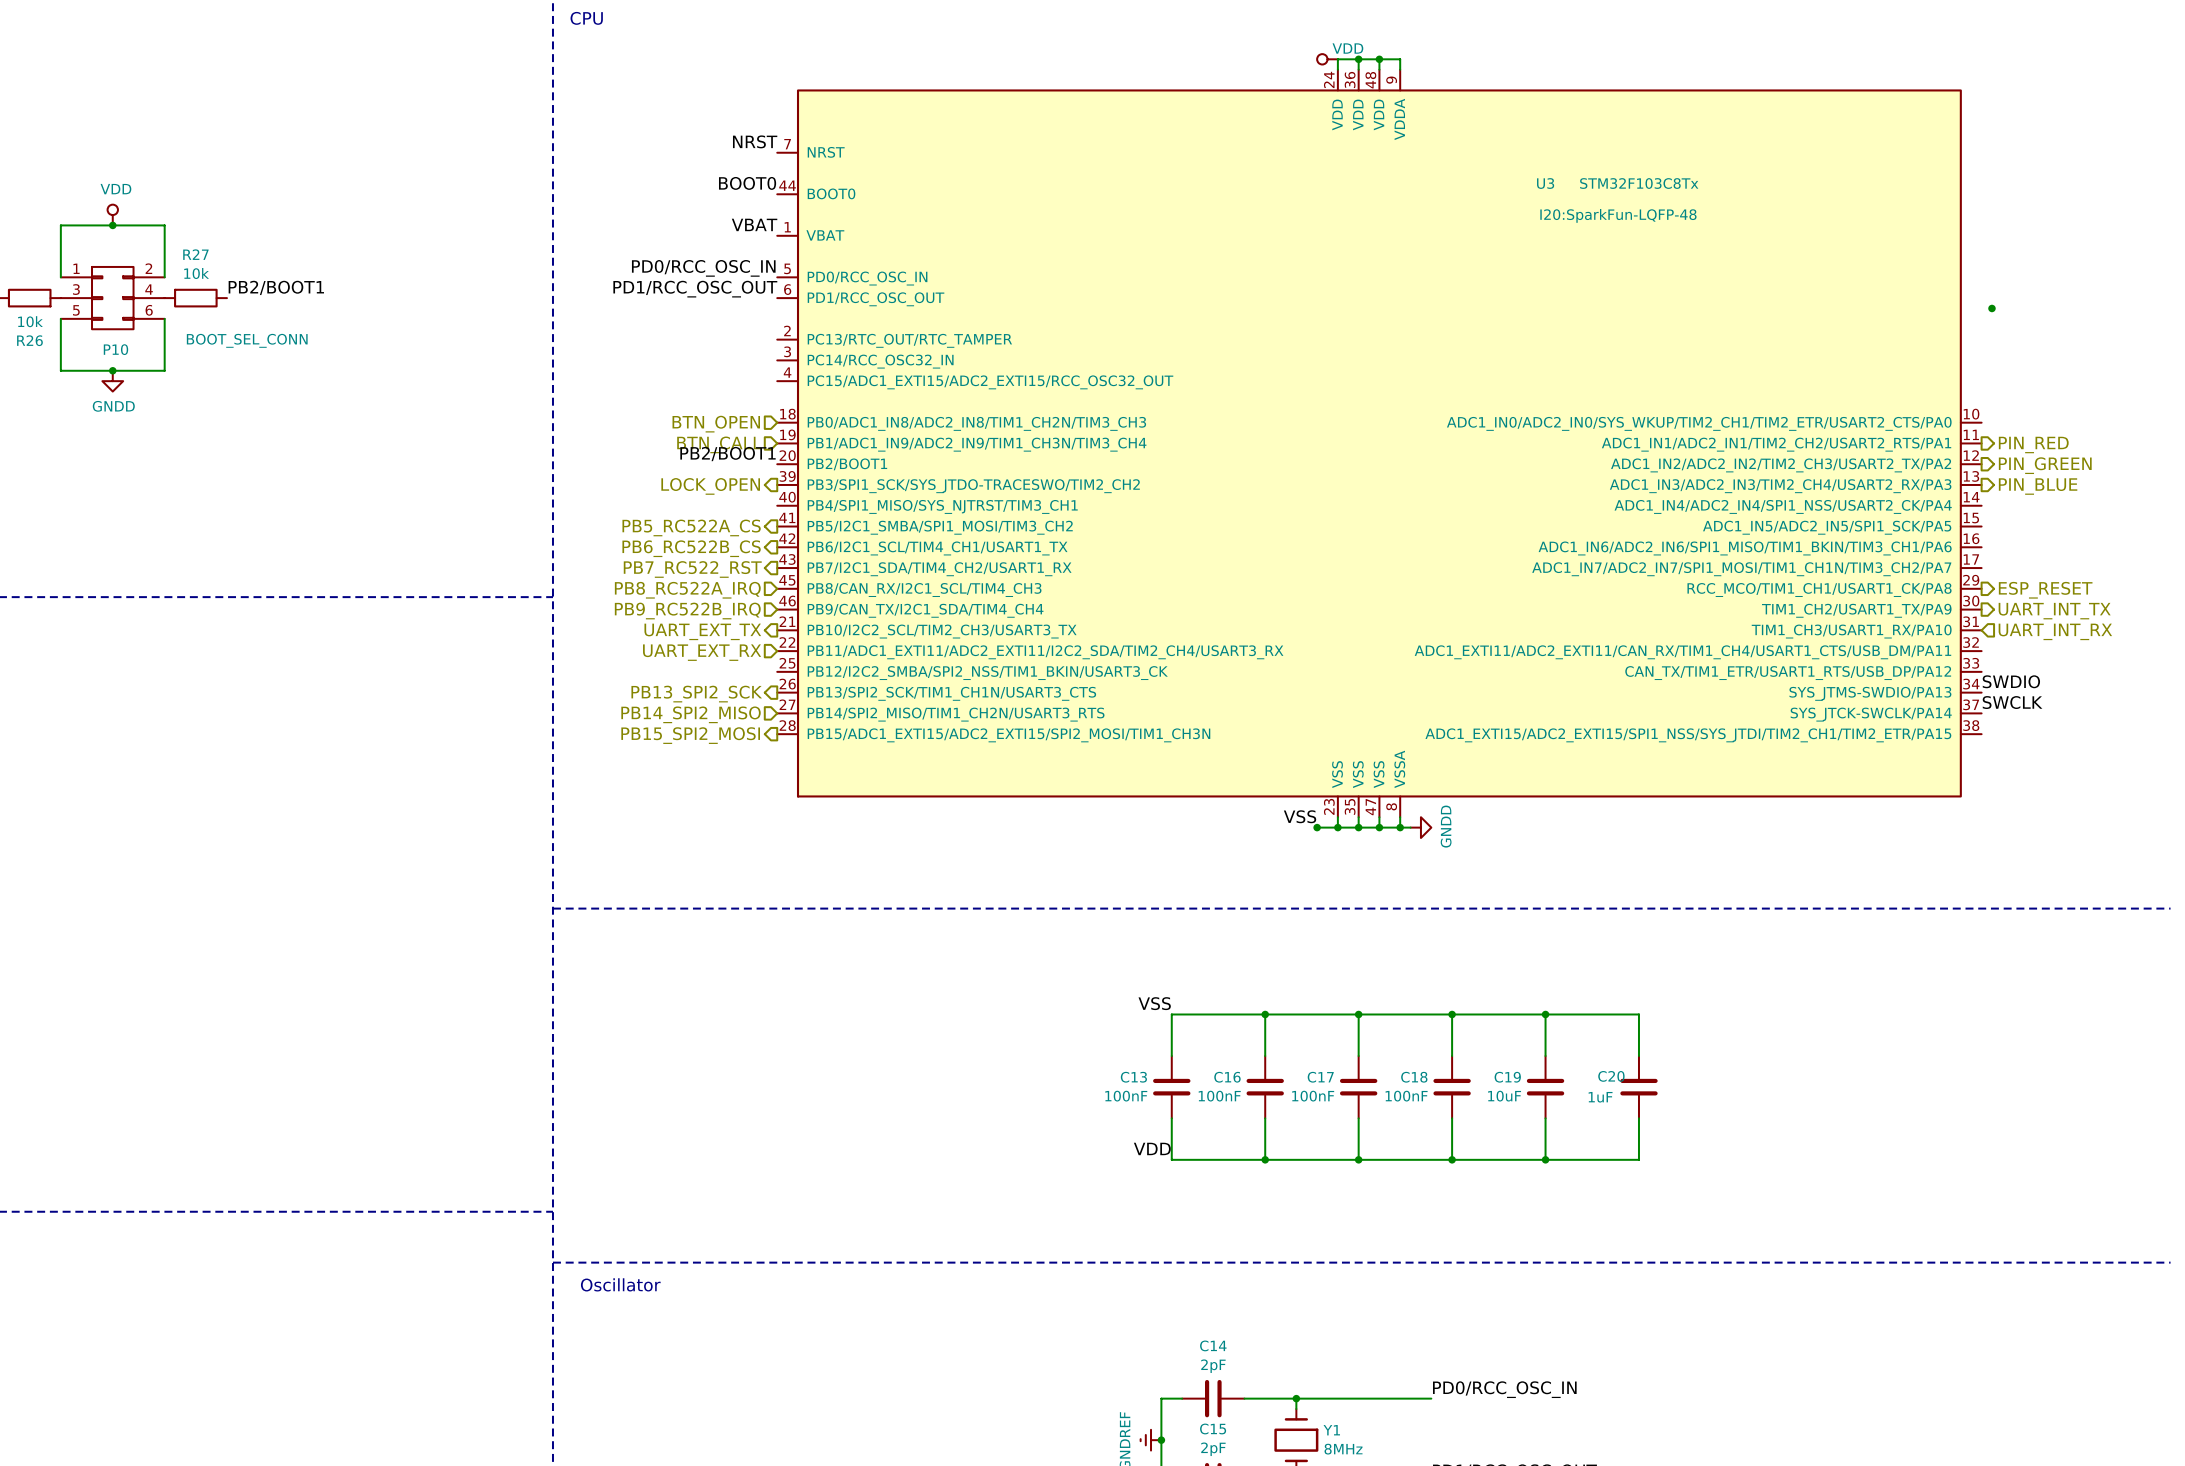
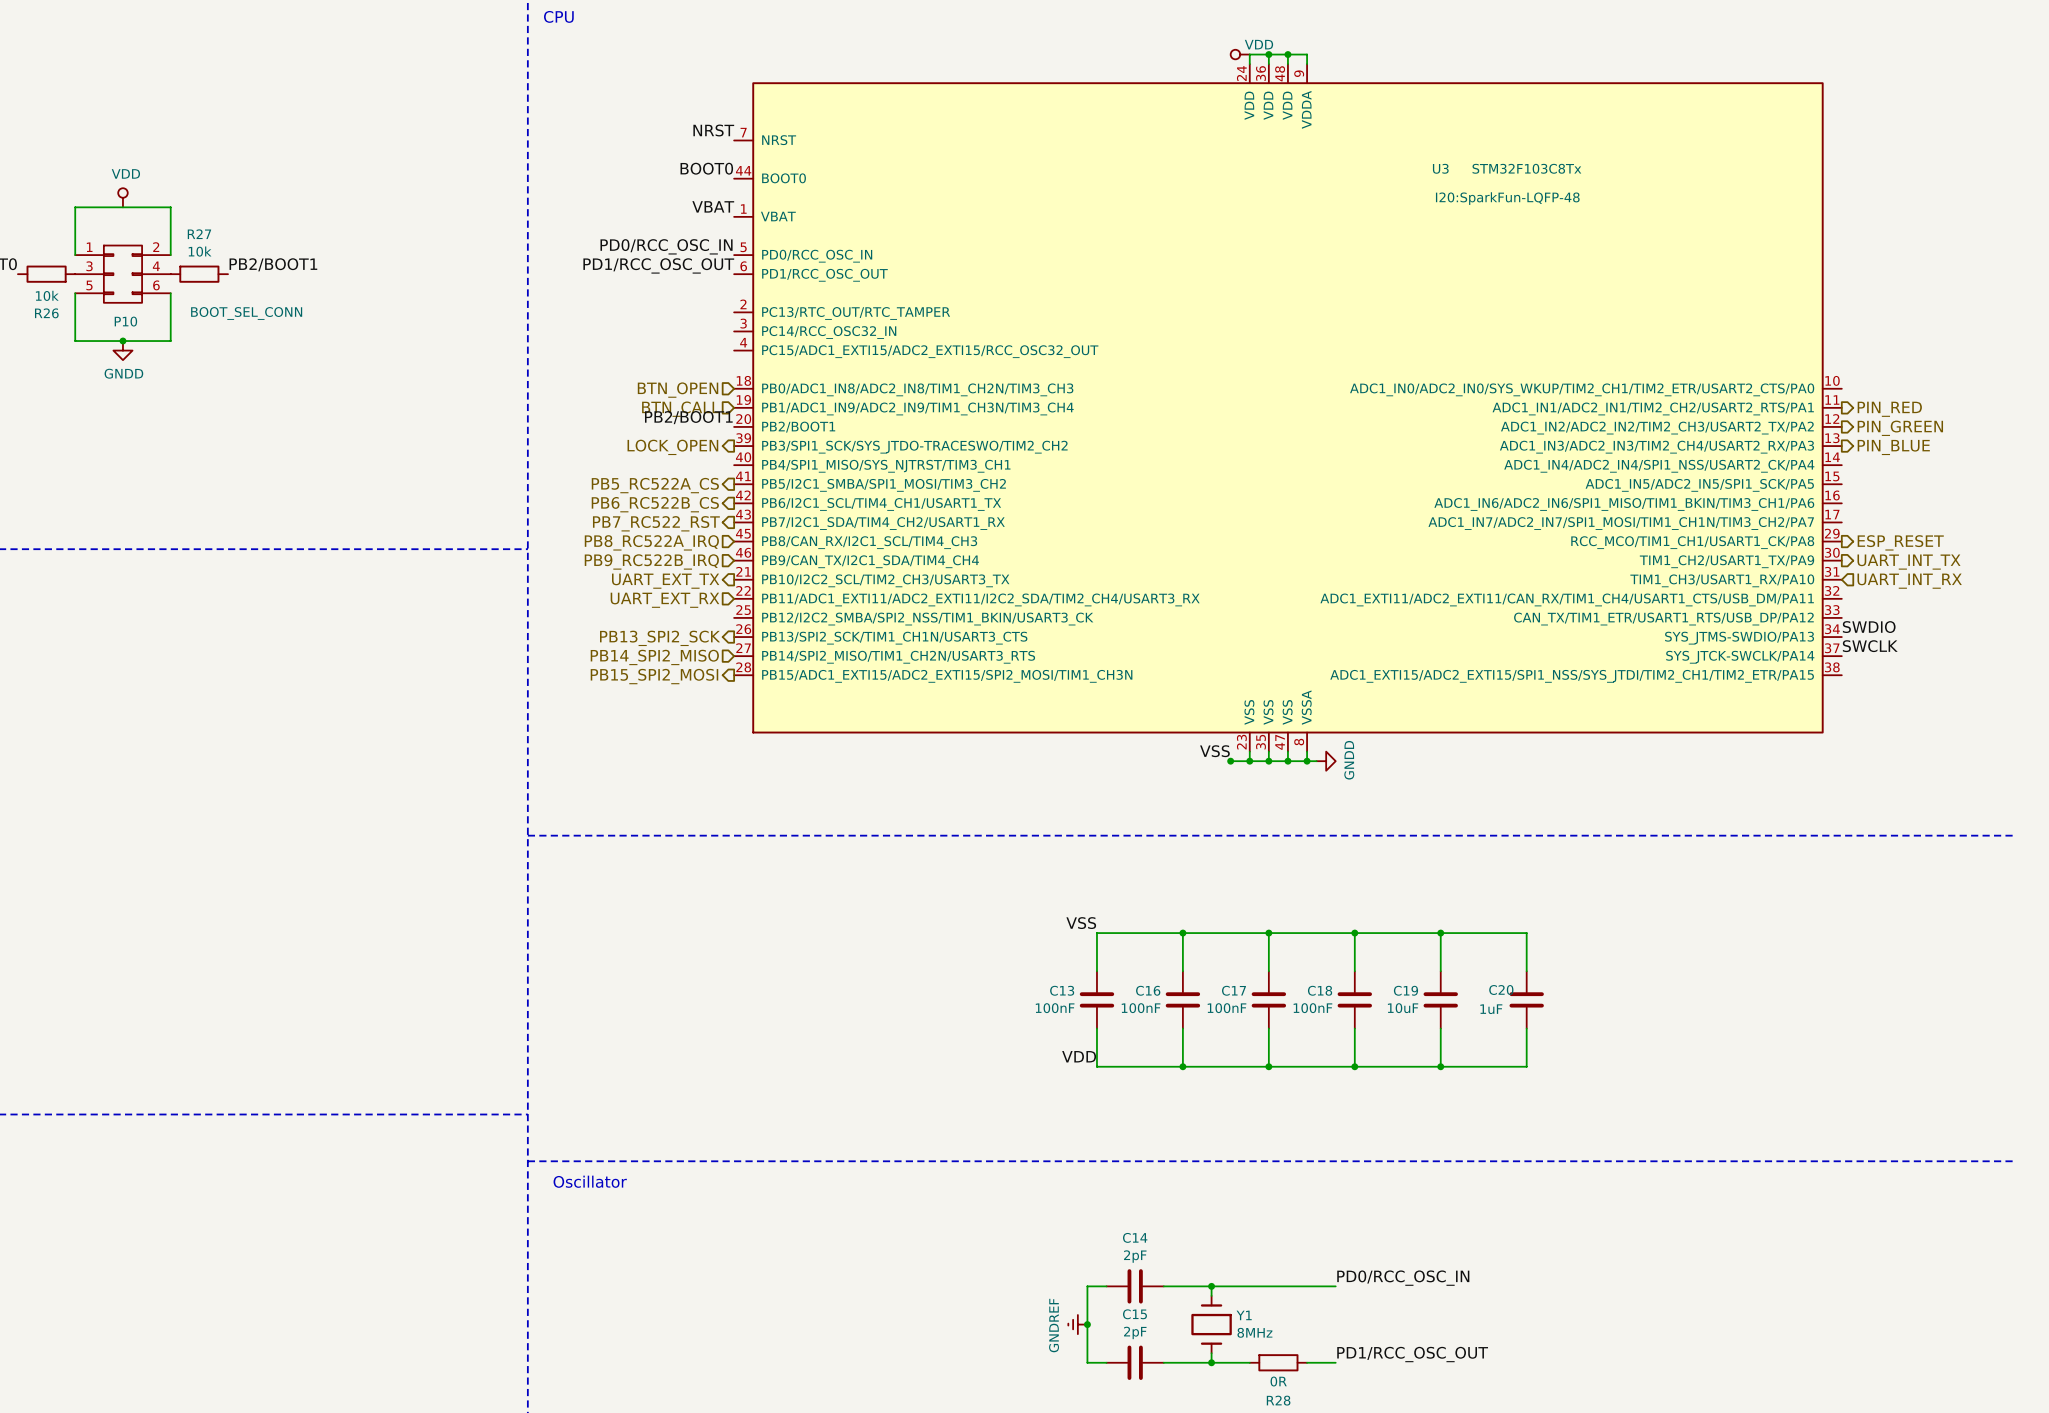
junction: (112, 225) -> none
junction: (1991, 308) -> none

